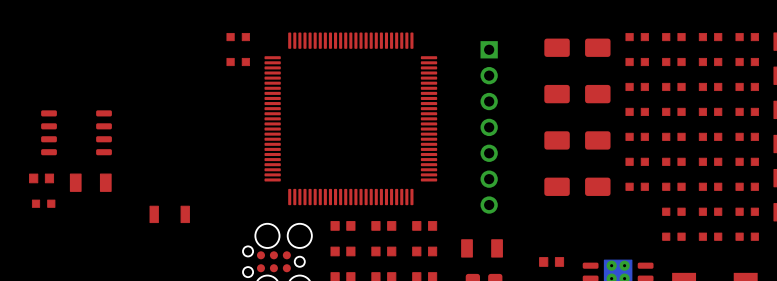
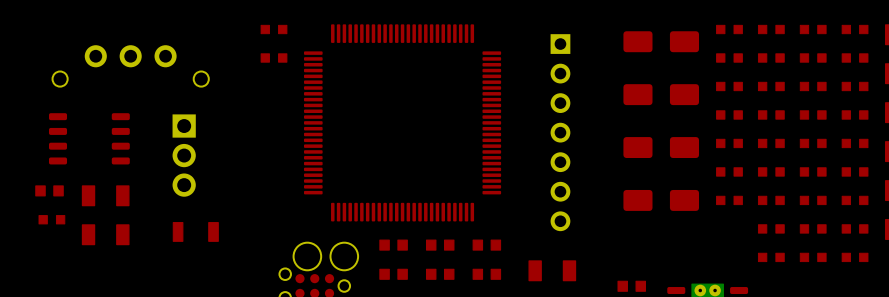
part: none -> (130, 65)
part: none -> (184, 155)
part: none -> (105, 234)

